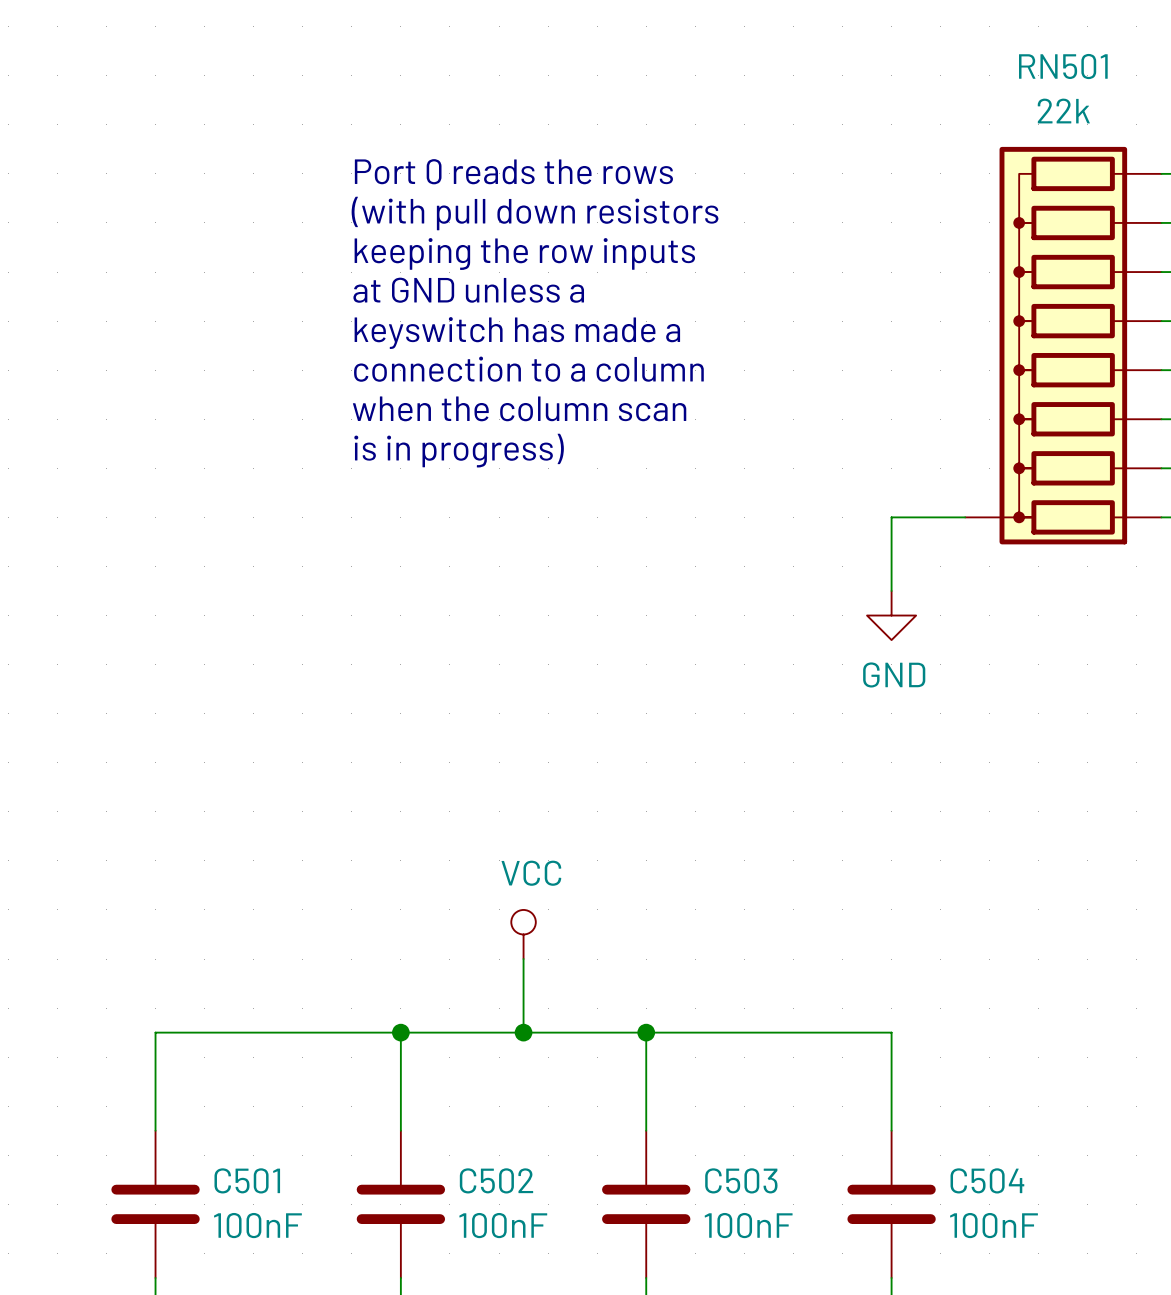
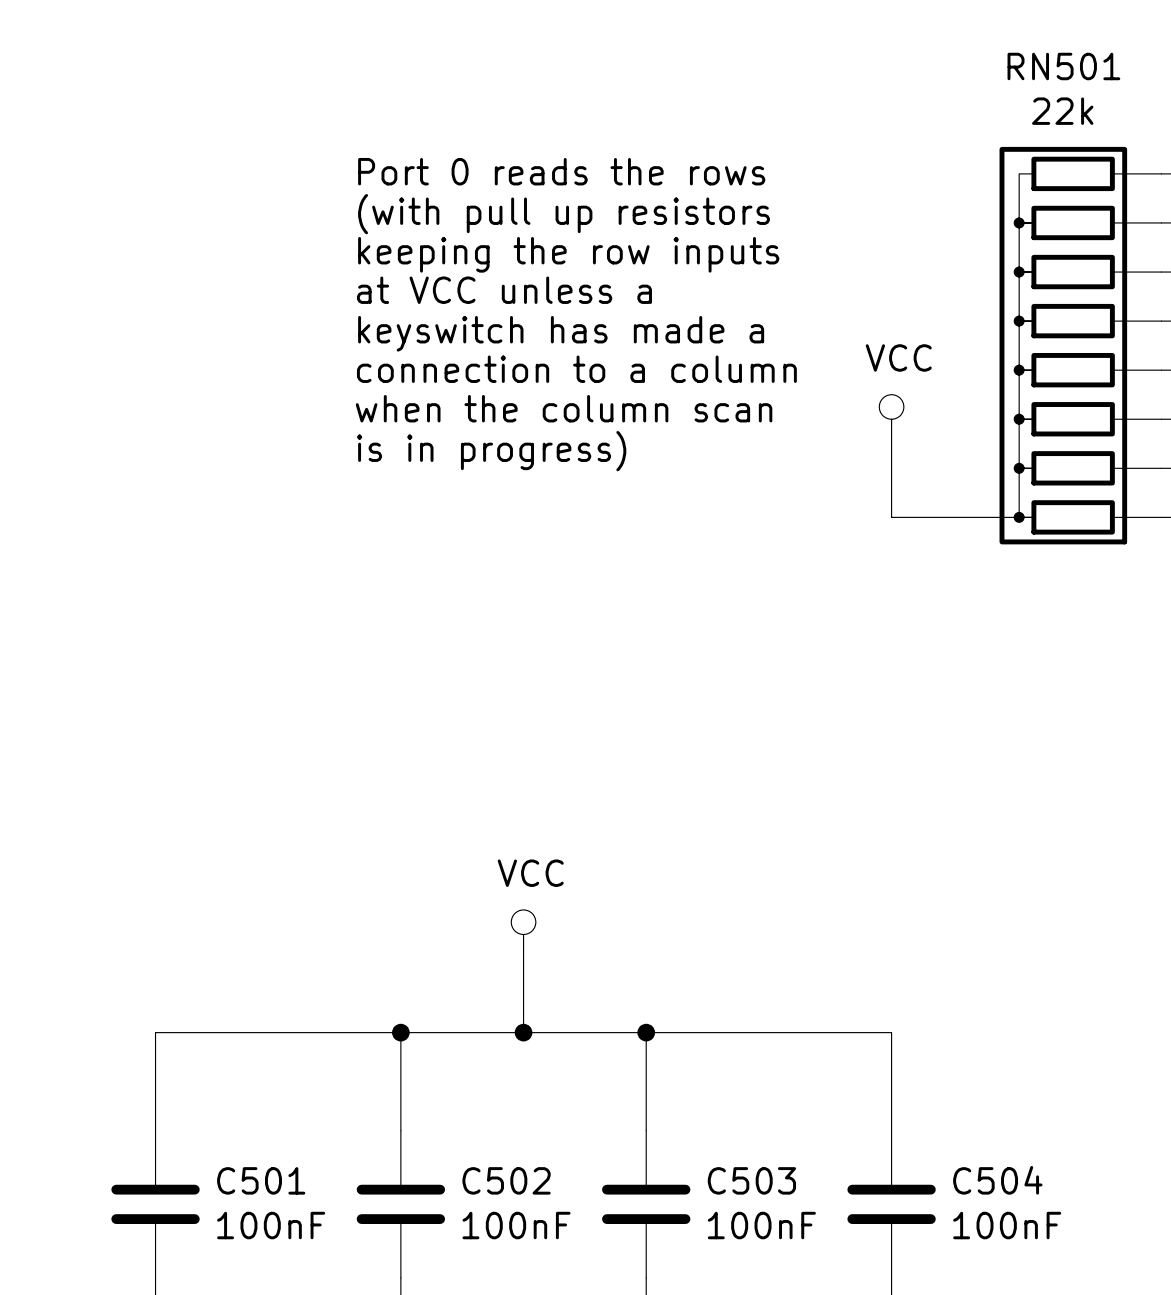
text: (with pull down resistors (535, 213) -> (with pull up resistors (564, 214)
text: at GND unless a (468, 290) -> at VCC unless a (504, 290)
power symbol: none -> VCC (891, 419)
wire: (891, 517) (891, 590) -> (891, 517) (891, 443)
power symbol: GND (891, 615) -> none

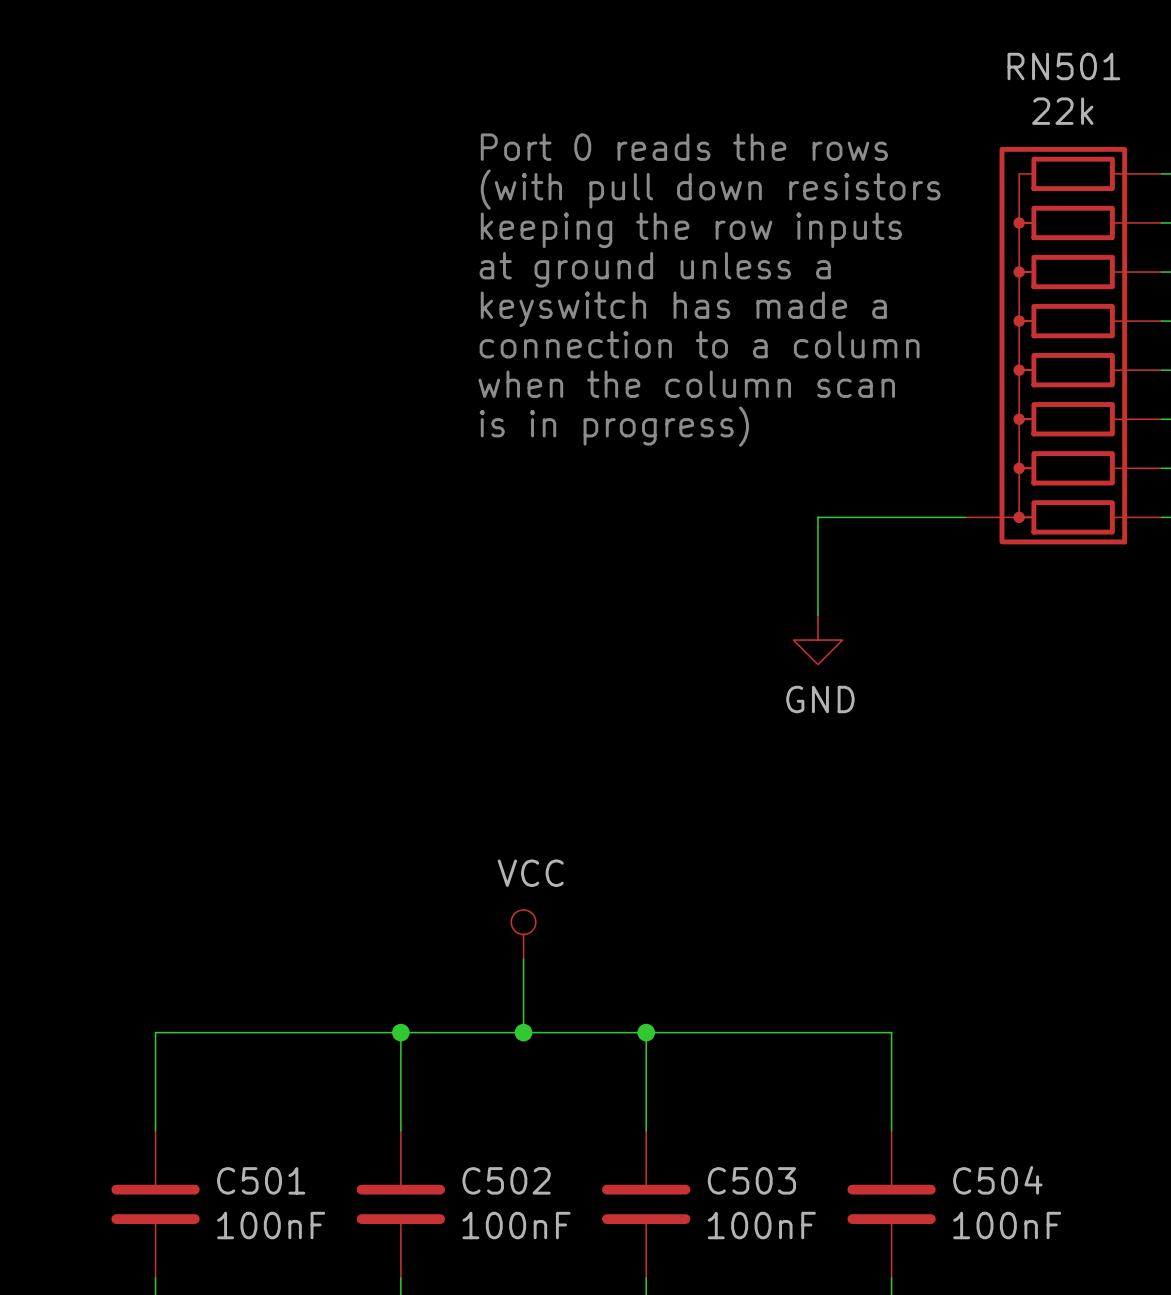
text position: Port 0 reads the rows (561, 171) -> Port 0 reads the rows (684, 147)
text: (with pull up resistors (564, 214) -> (with pull down resistors (710, 189)
text position: keeping the row inputs (568, 254) -> keeping the row inputs (691, 230)
text: at VCC unless a (504, 290) -> at ground unless a (655, 269)
text position: keyswitch has made a (561, 333) -> keyswitch has made a (683, 309)
text position: connection to a column (576, 369) -> connection to a column (699, 344)
text position: when the column scan (564, 408) -> when the column scan (686, 384)
power symbol: VCC (891, 419) -> none
wire: (891, 443) (891, 517) -> (817, 615) (817, 517) (891, 517)
text position: is in progress) (491, 451) -> is in progress) (614, 426)
power symbol: none -> GND (817, 640)

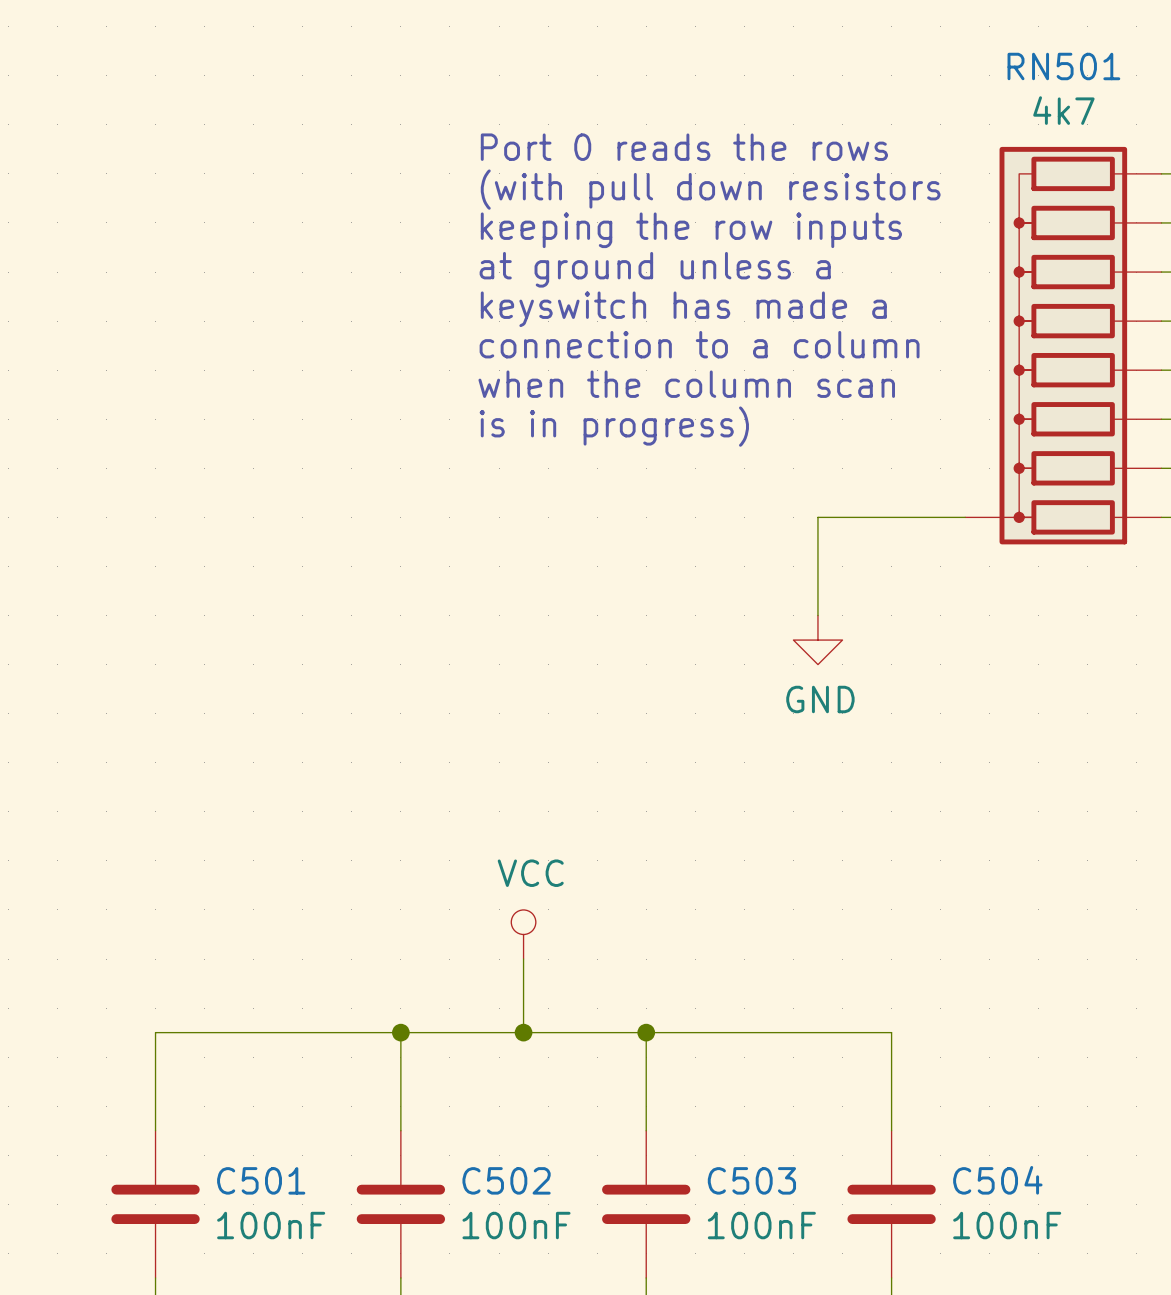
RN501 value: 22k (1062, 111) -> 4k7 (1063, 110)

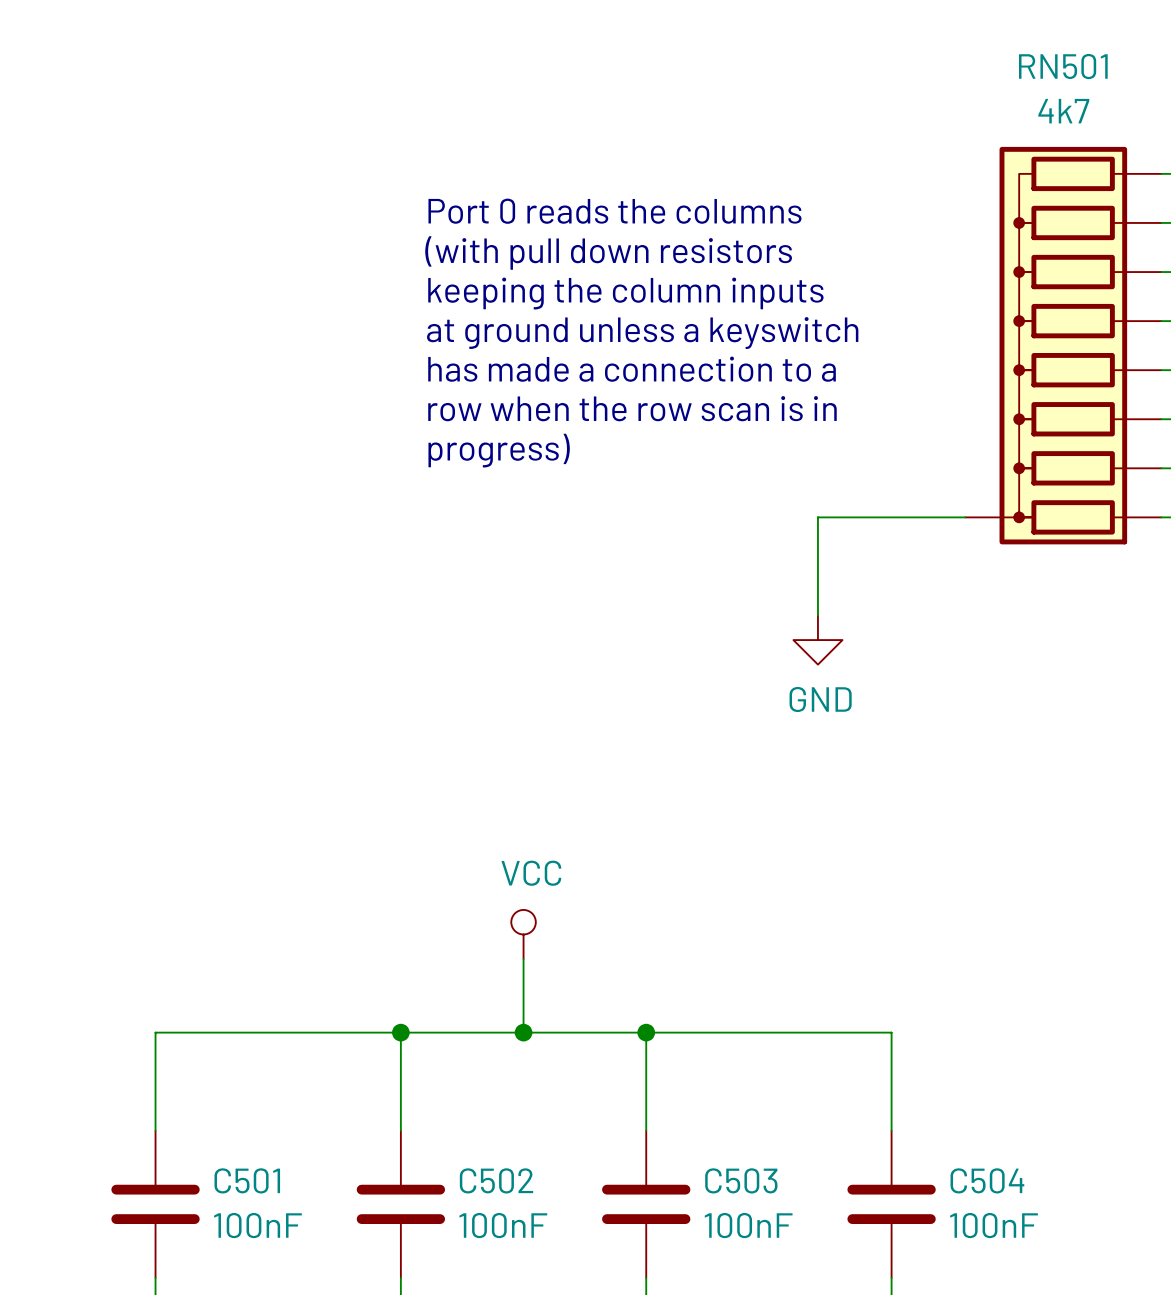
text: Port 0 reads the rows (684, 147) -> none
text position: (with pull down resistors (710, 189) -> (with pull down resistors (608, 253)
text: none -> Port 0 reads the columns (614, 211)
text: keeping the row inputs (691, 230) -> none
text: at ground unless a (655, 269) -> none
text: none -> keeping the column inputs (625, 293)
text: keyswitch has made a (683, 309) -> none
text: none -> at ground unless a keyswitch (642, 333)
text: connection to a column (699, 344) -> has made a connection to a (632, 369)
text: when the column scan (686, 384) -> row when the row scan is in (632, 408)
text: is in progress) (614, 426) -> progress) (499, 450)

